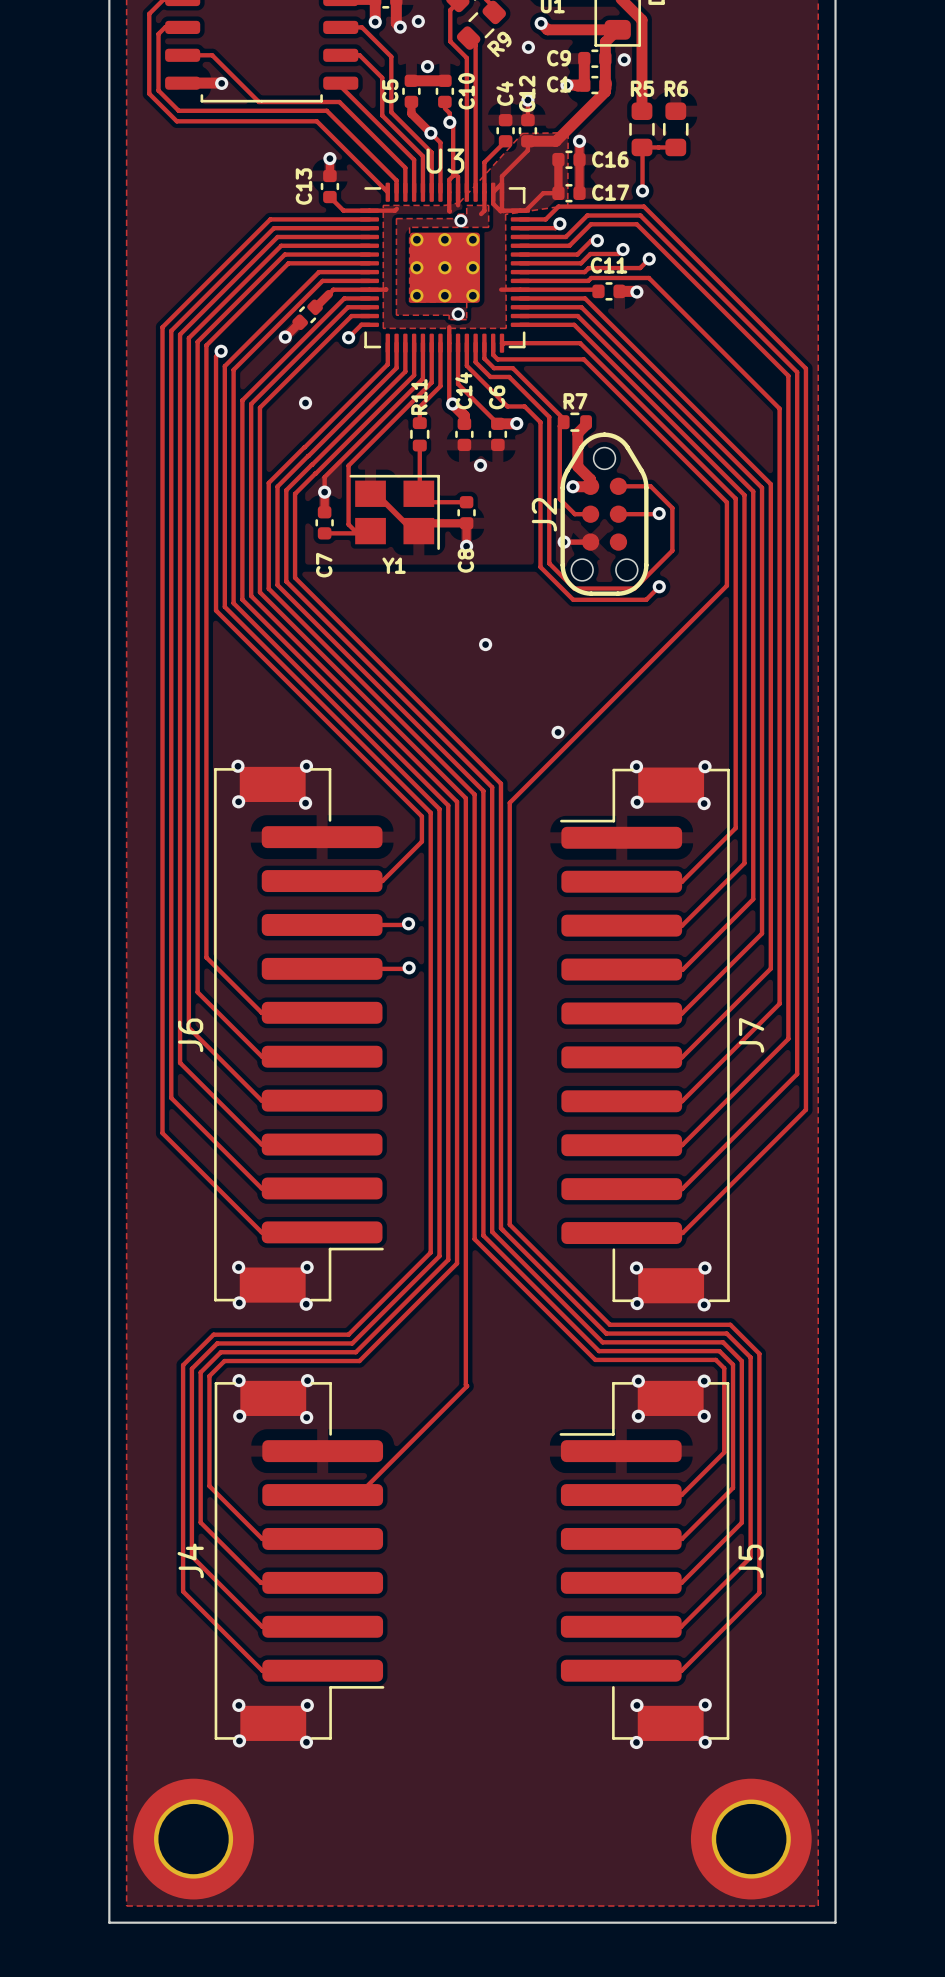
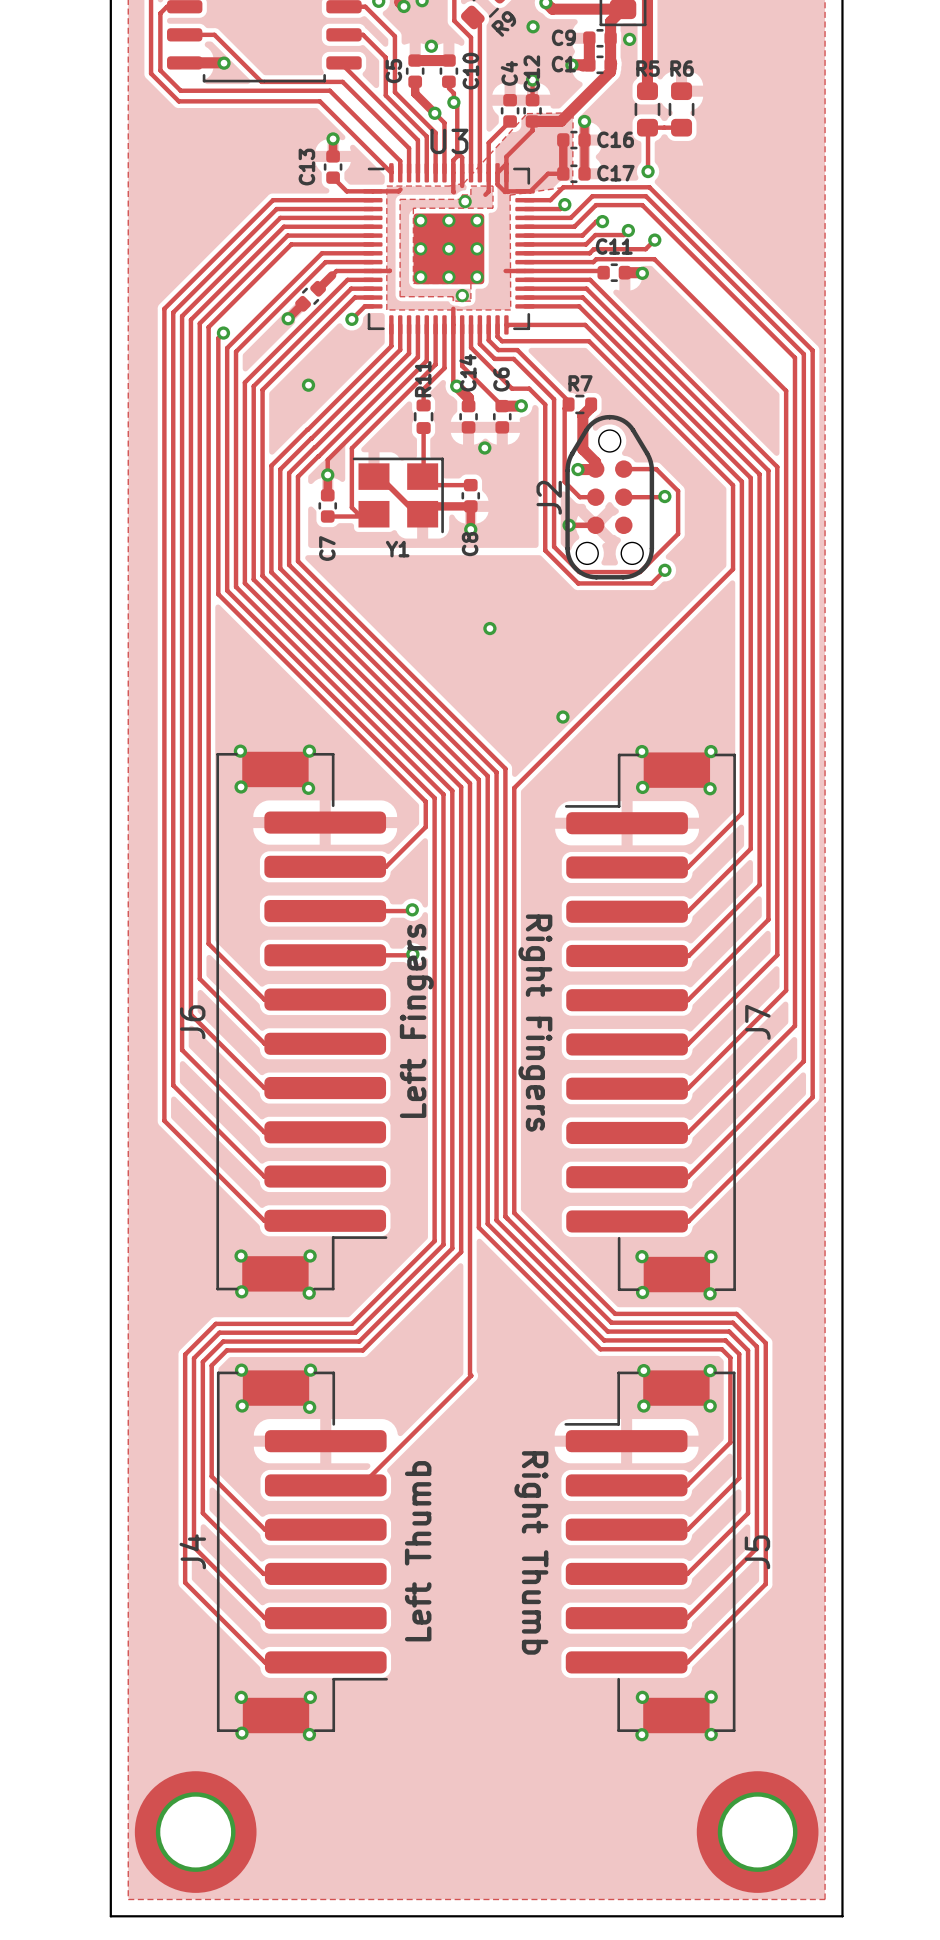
text: none -> Left Fingers (416, 1020)
text: none -> Right Fingers (535, 1023)
text: none -> Left Thumb (418, 1551)
text: none -> Right Thumb (531, 1552)

